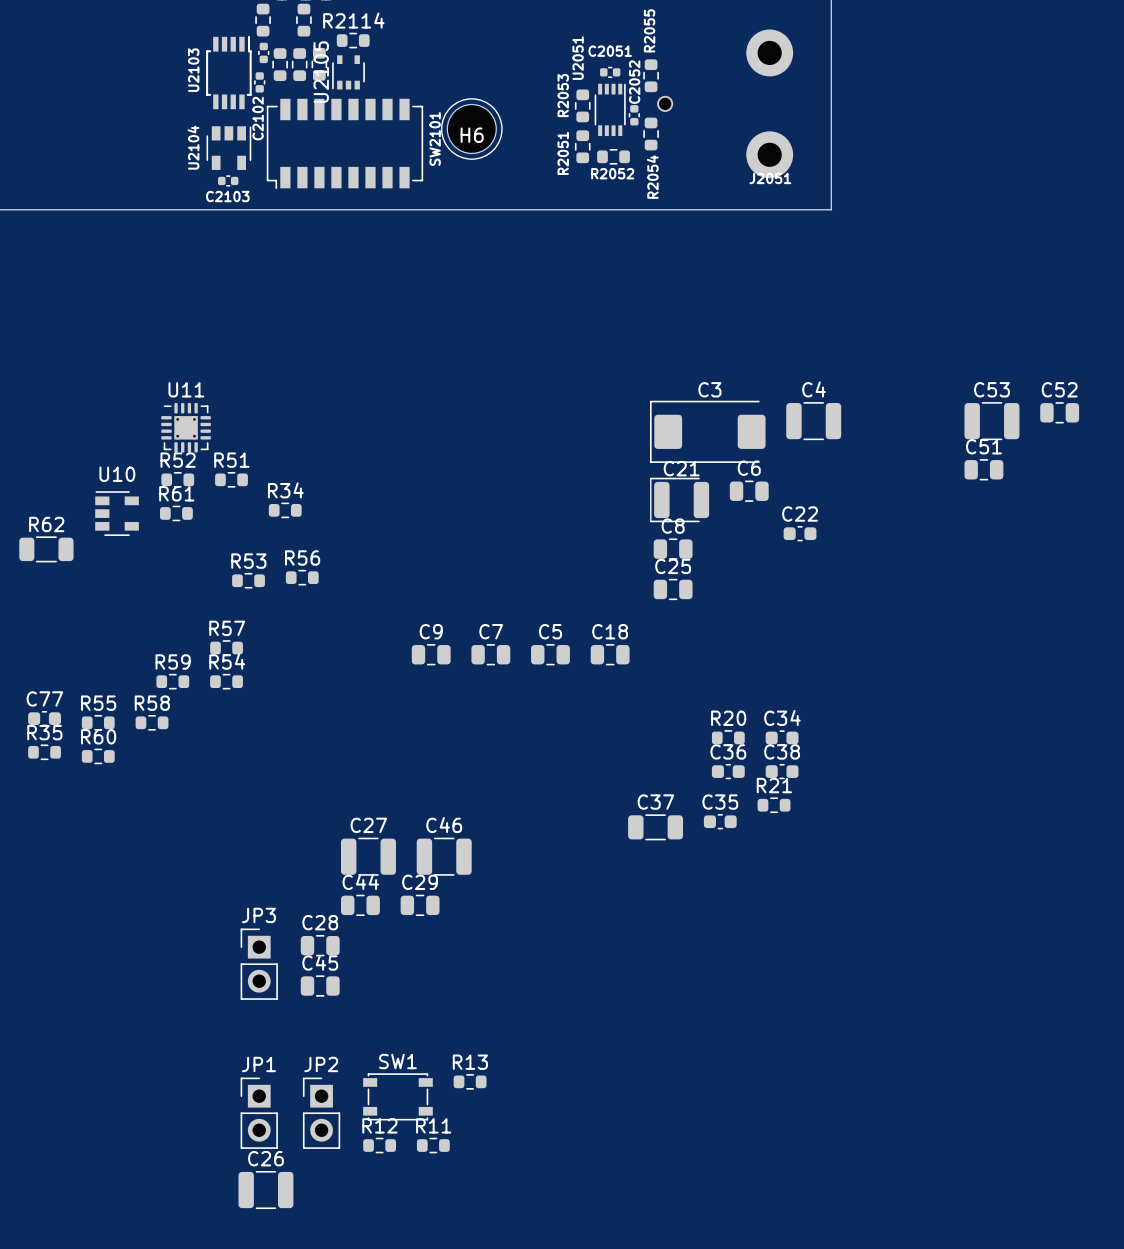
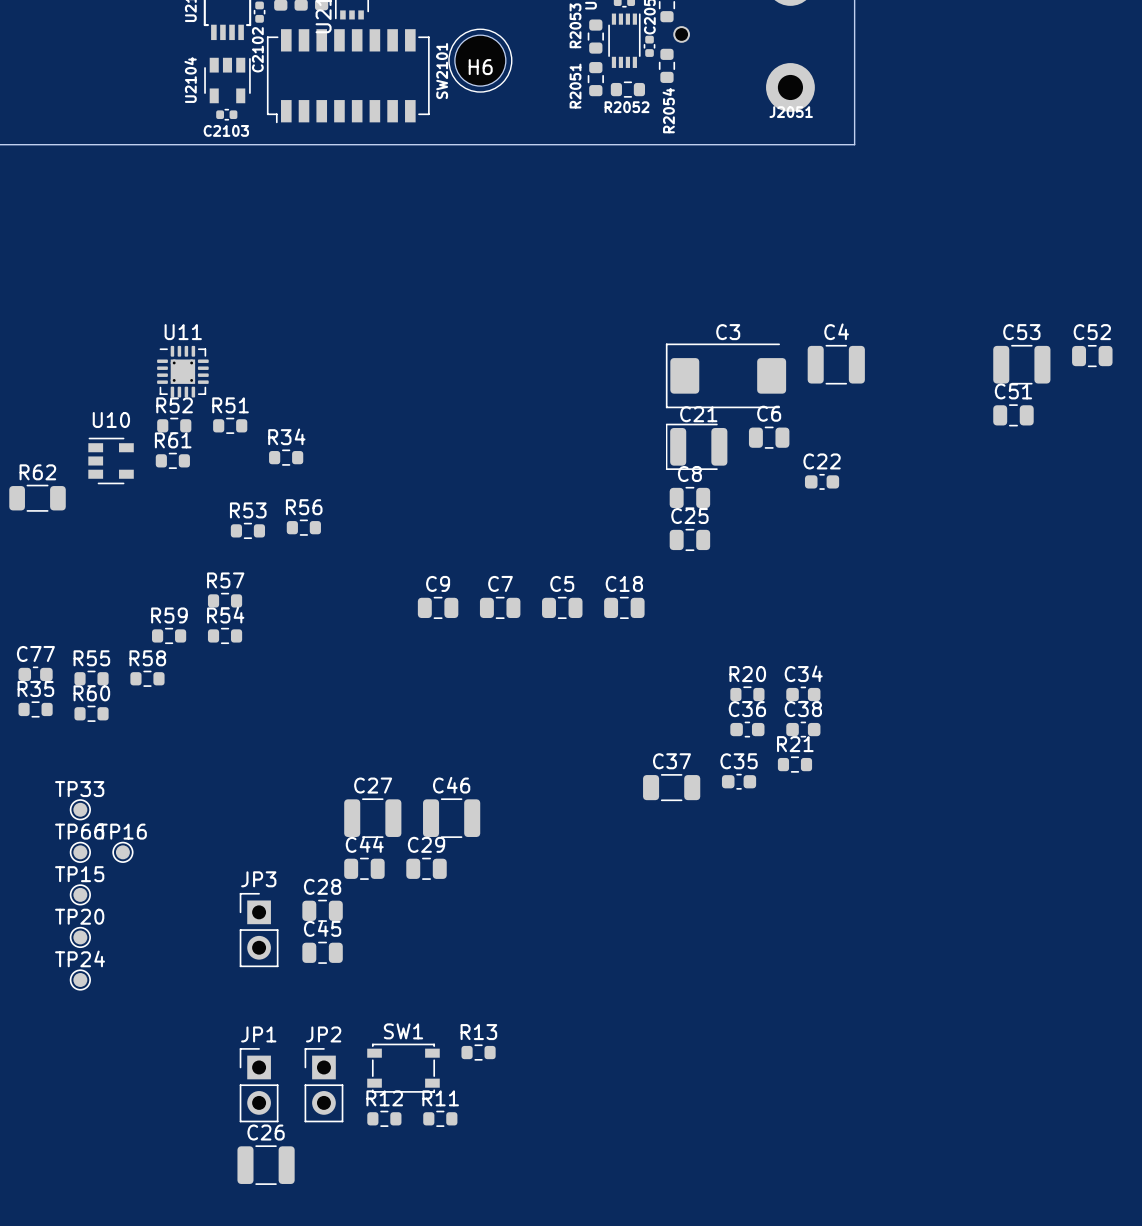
TP33: none -> (80, 809)
TP66: none -> (80, 852)
TP16: none -> (122, 852)
TP15: none -> (80, 894)
TP20: none -> (80, 937)
TP24: none -> (80, 980)

